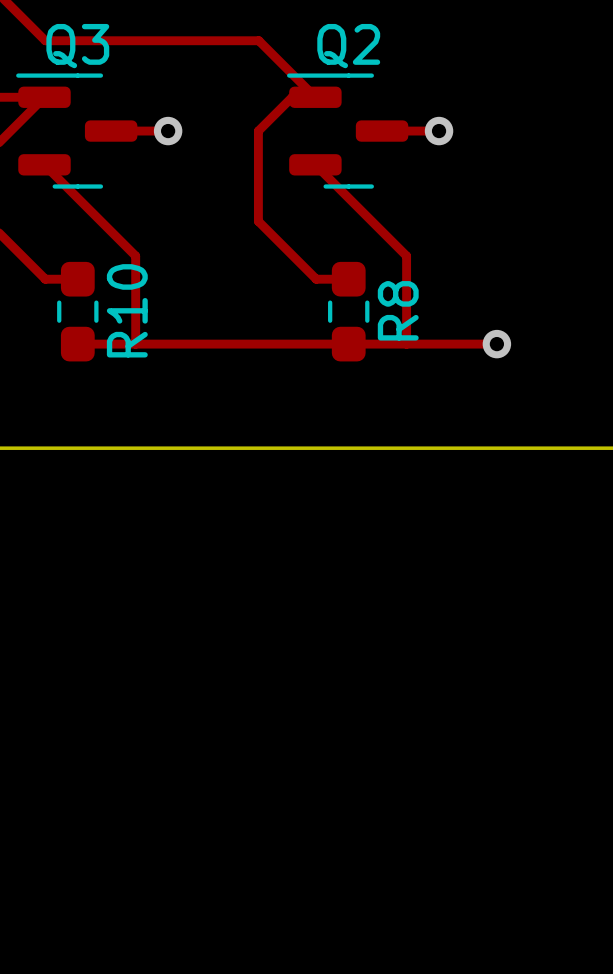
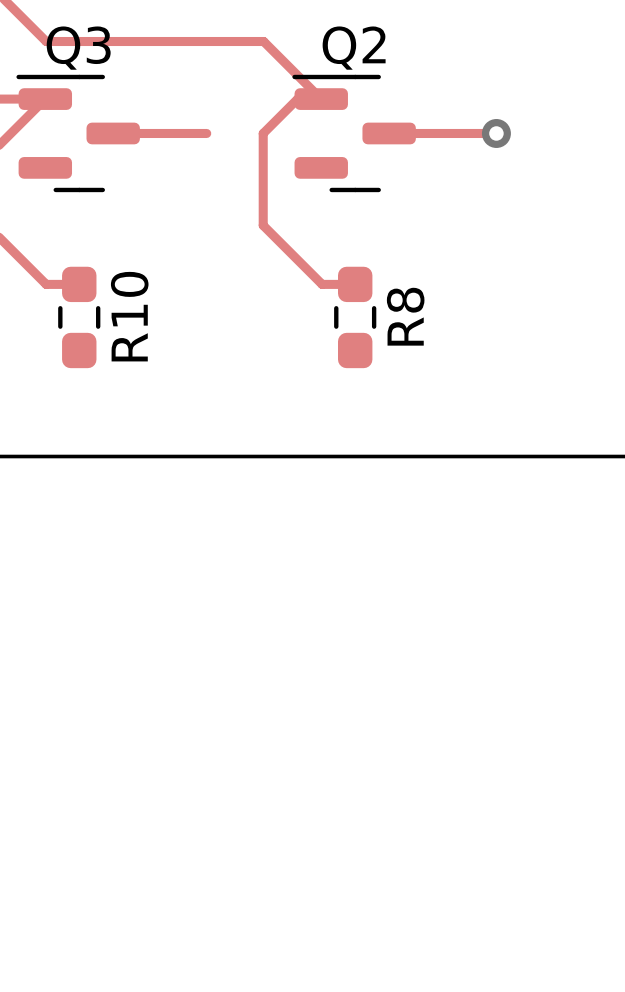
track: none -> (171, 133) (206, 133)
via: (168, 131) -> none
track: none -> (447, 133) (496, 133)
via position: (439, 131) -> (496, 133)
track: (44, 164) (135, 256) (135, 344) -> none
track: (315, 164) (406, 256) (406, 344) -> none
track: (77, 344) (496, 344) -> none
via: (496, 344) -> none

